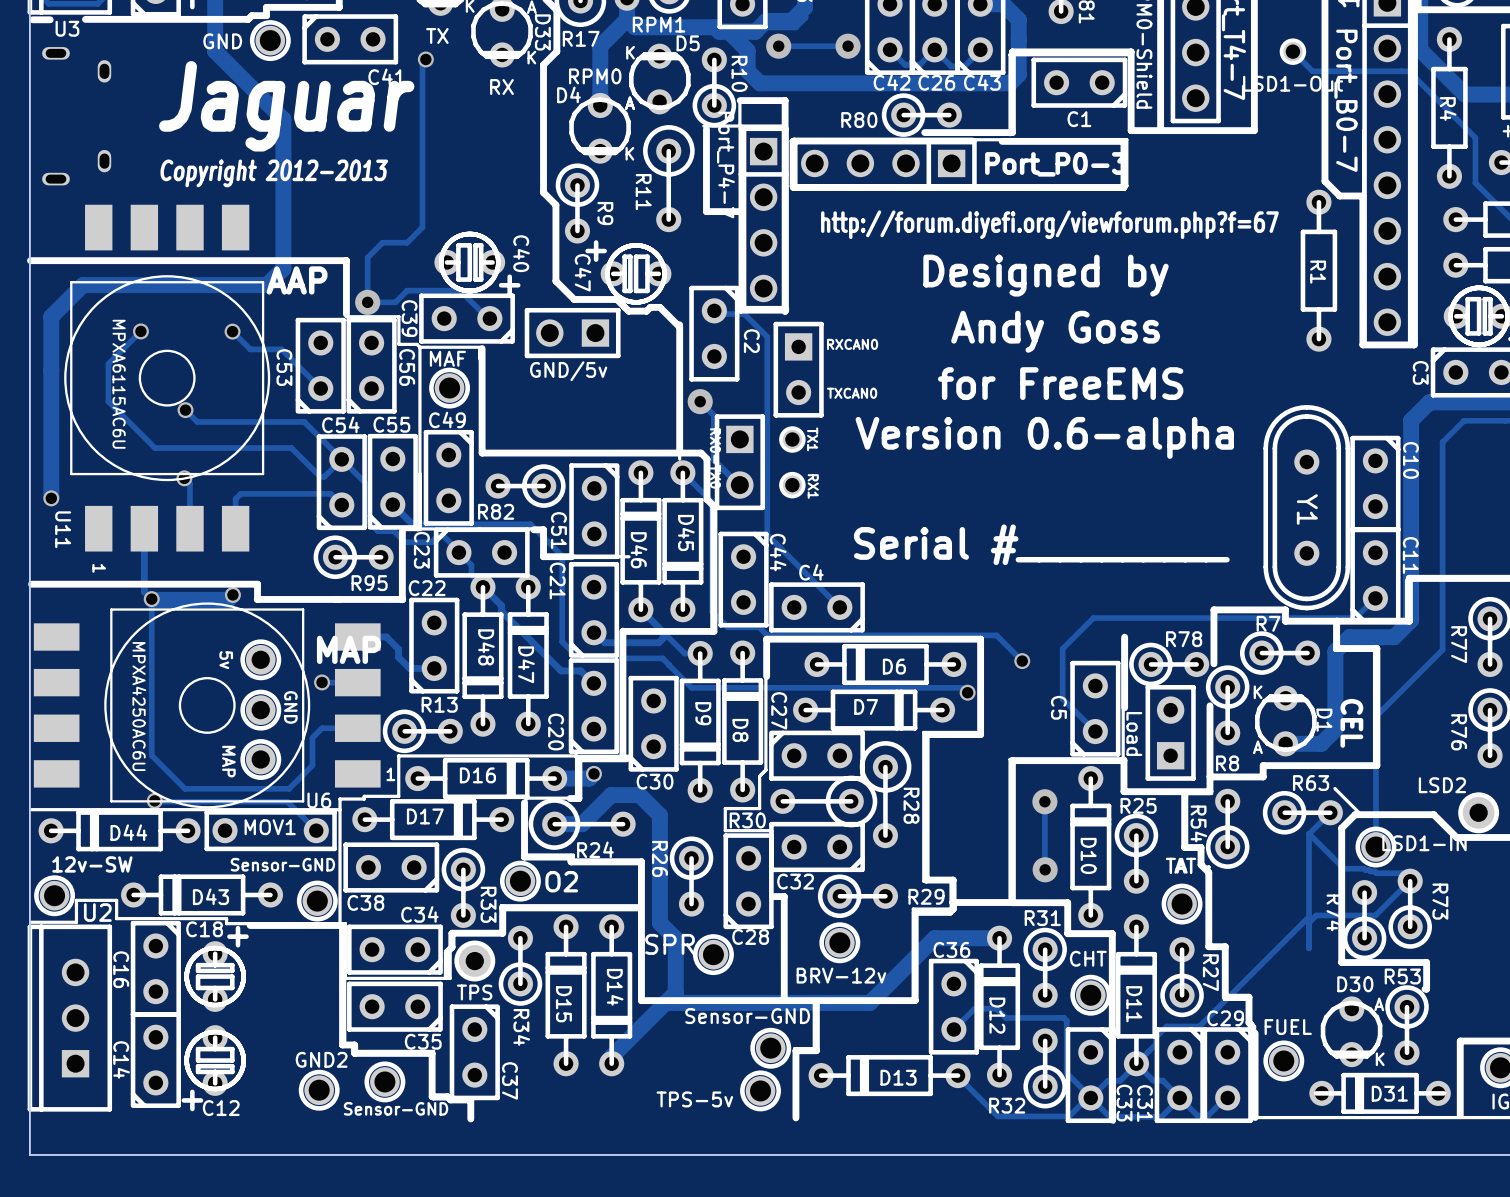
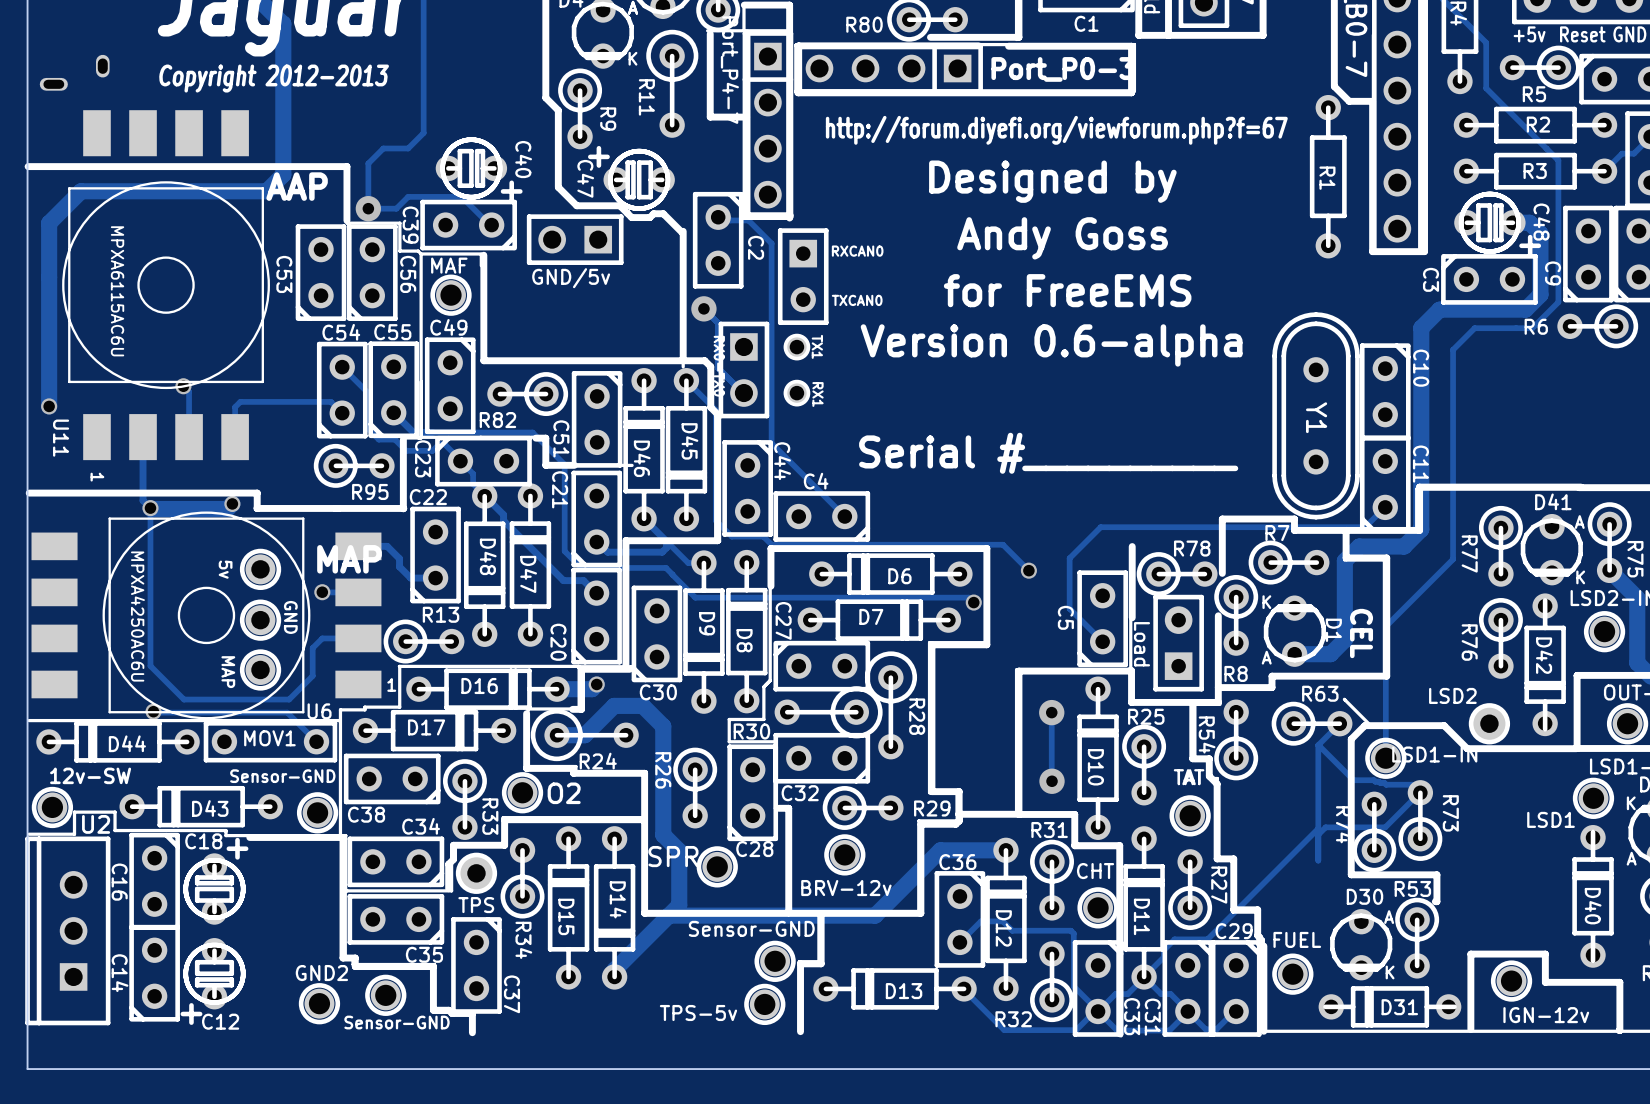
track: (140, 331) (108, 363) (108, 401) (154, 448) (291, 448) (320, 476) (324, 476) (341, 459) (304, 421) (197, 421) (185, 410) -> none
via: (140, 331) -> none
track: (232, 331) (250, 349) (281, 349) (320, 388) -> none
via: (232, 331) -> none
via: (185, 410) -> none

